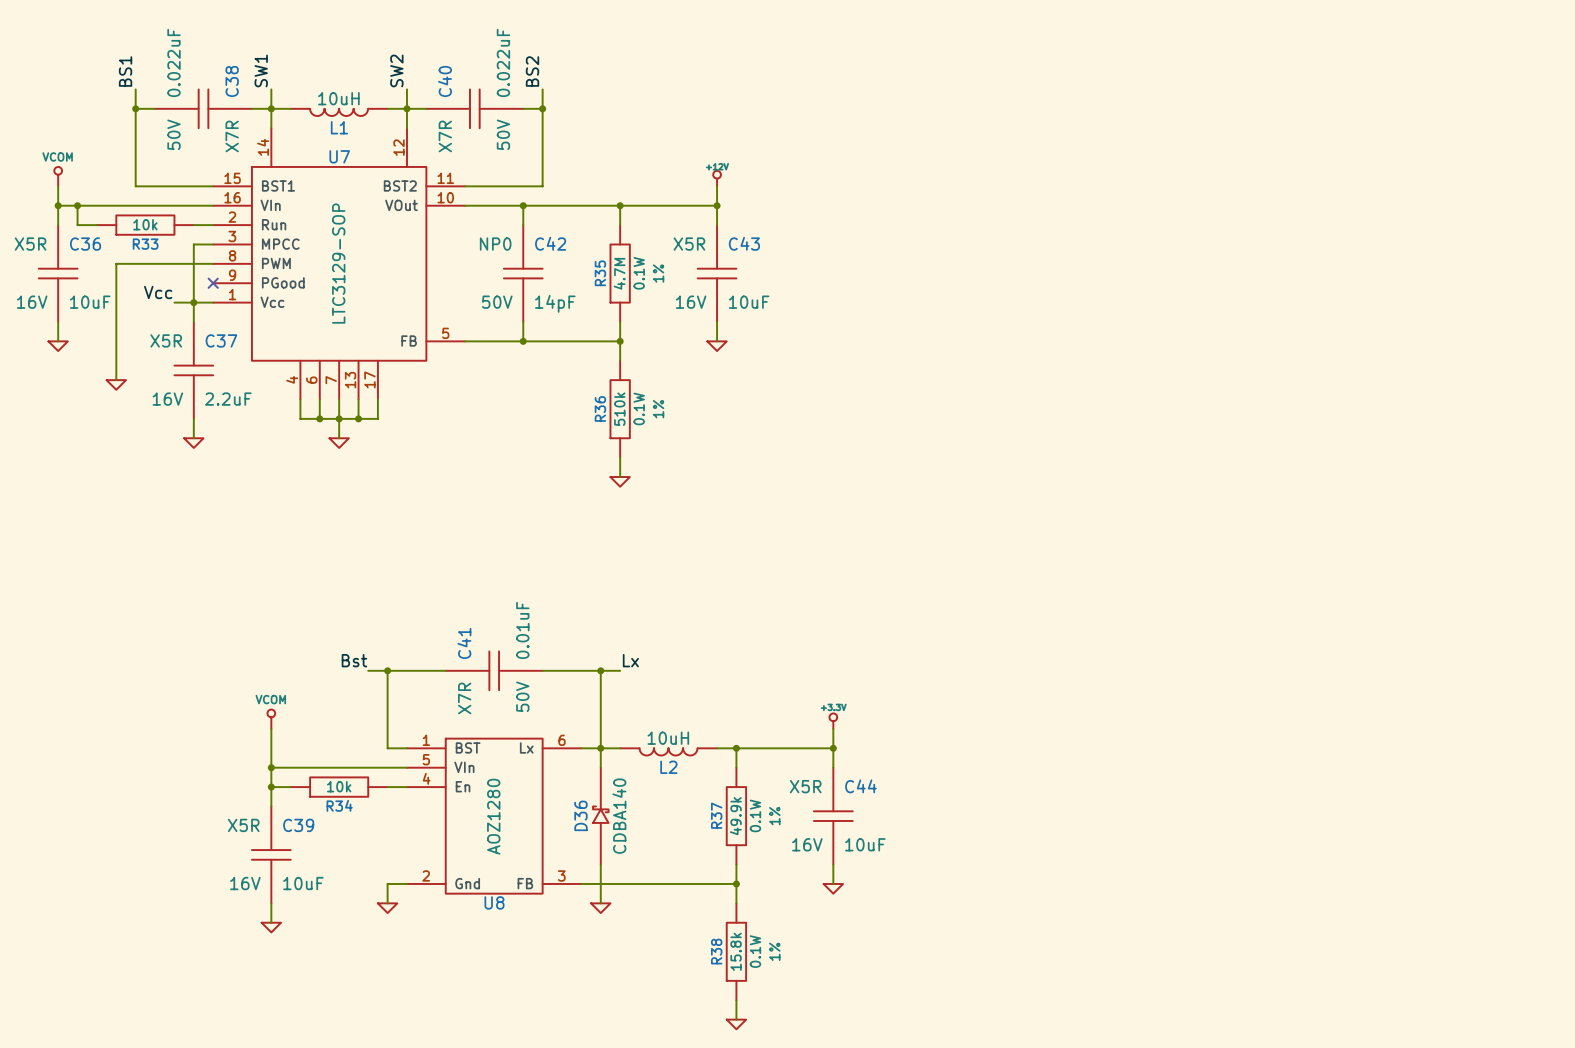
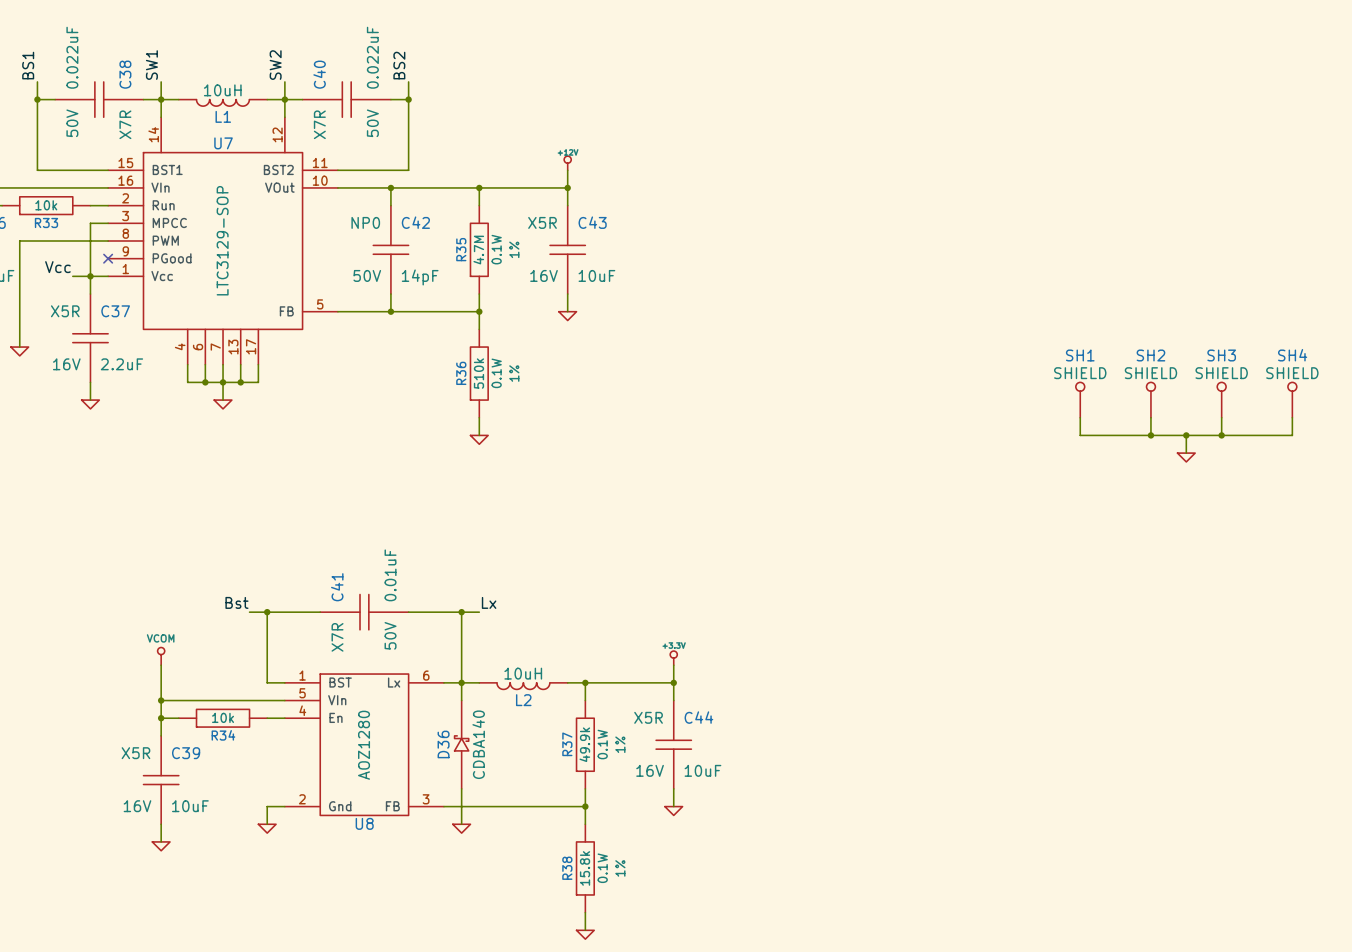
SH1: none -> SHIELD (1080, 400)
SH2: none -> SHIELD (1150, 400)
SH3: none -> SHIELD (1221, 400)
SH4: none -> SHIELD (1292, 400)
wire: none -> (1080, 417) (1080, 435) (1292, 435) (1292, 417)
wire: none -> (1150, 417) (1150, 435)
wire: none -> (1221, 417) (1221, 435)
junction: none -> (1150, 435)
wire: none -> (1186, 435) (1186, 453)
junction: none -> (1186, 435)
junction: none -> (1221, 435)
power symbol: none -> (1186, 457)

